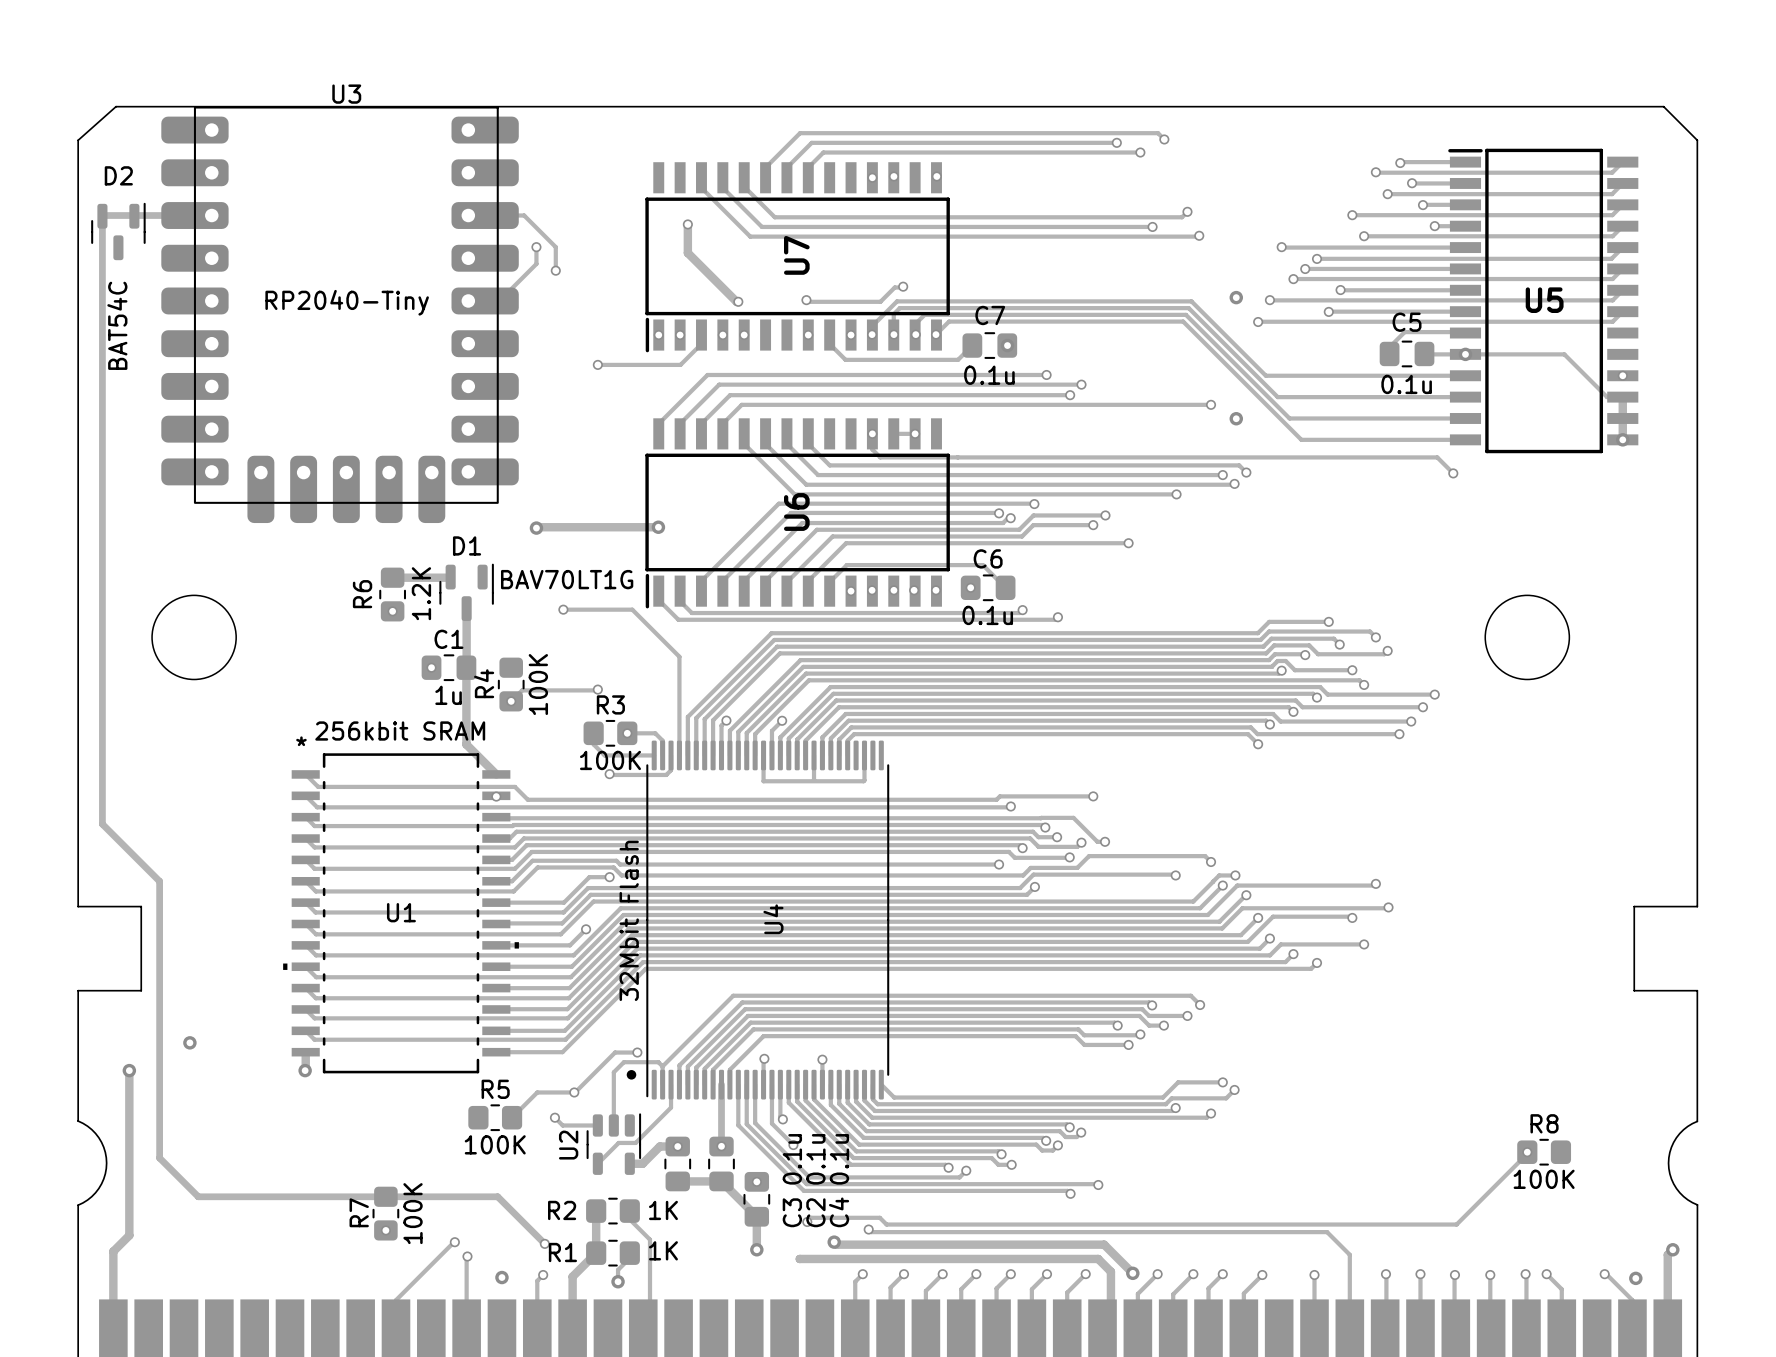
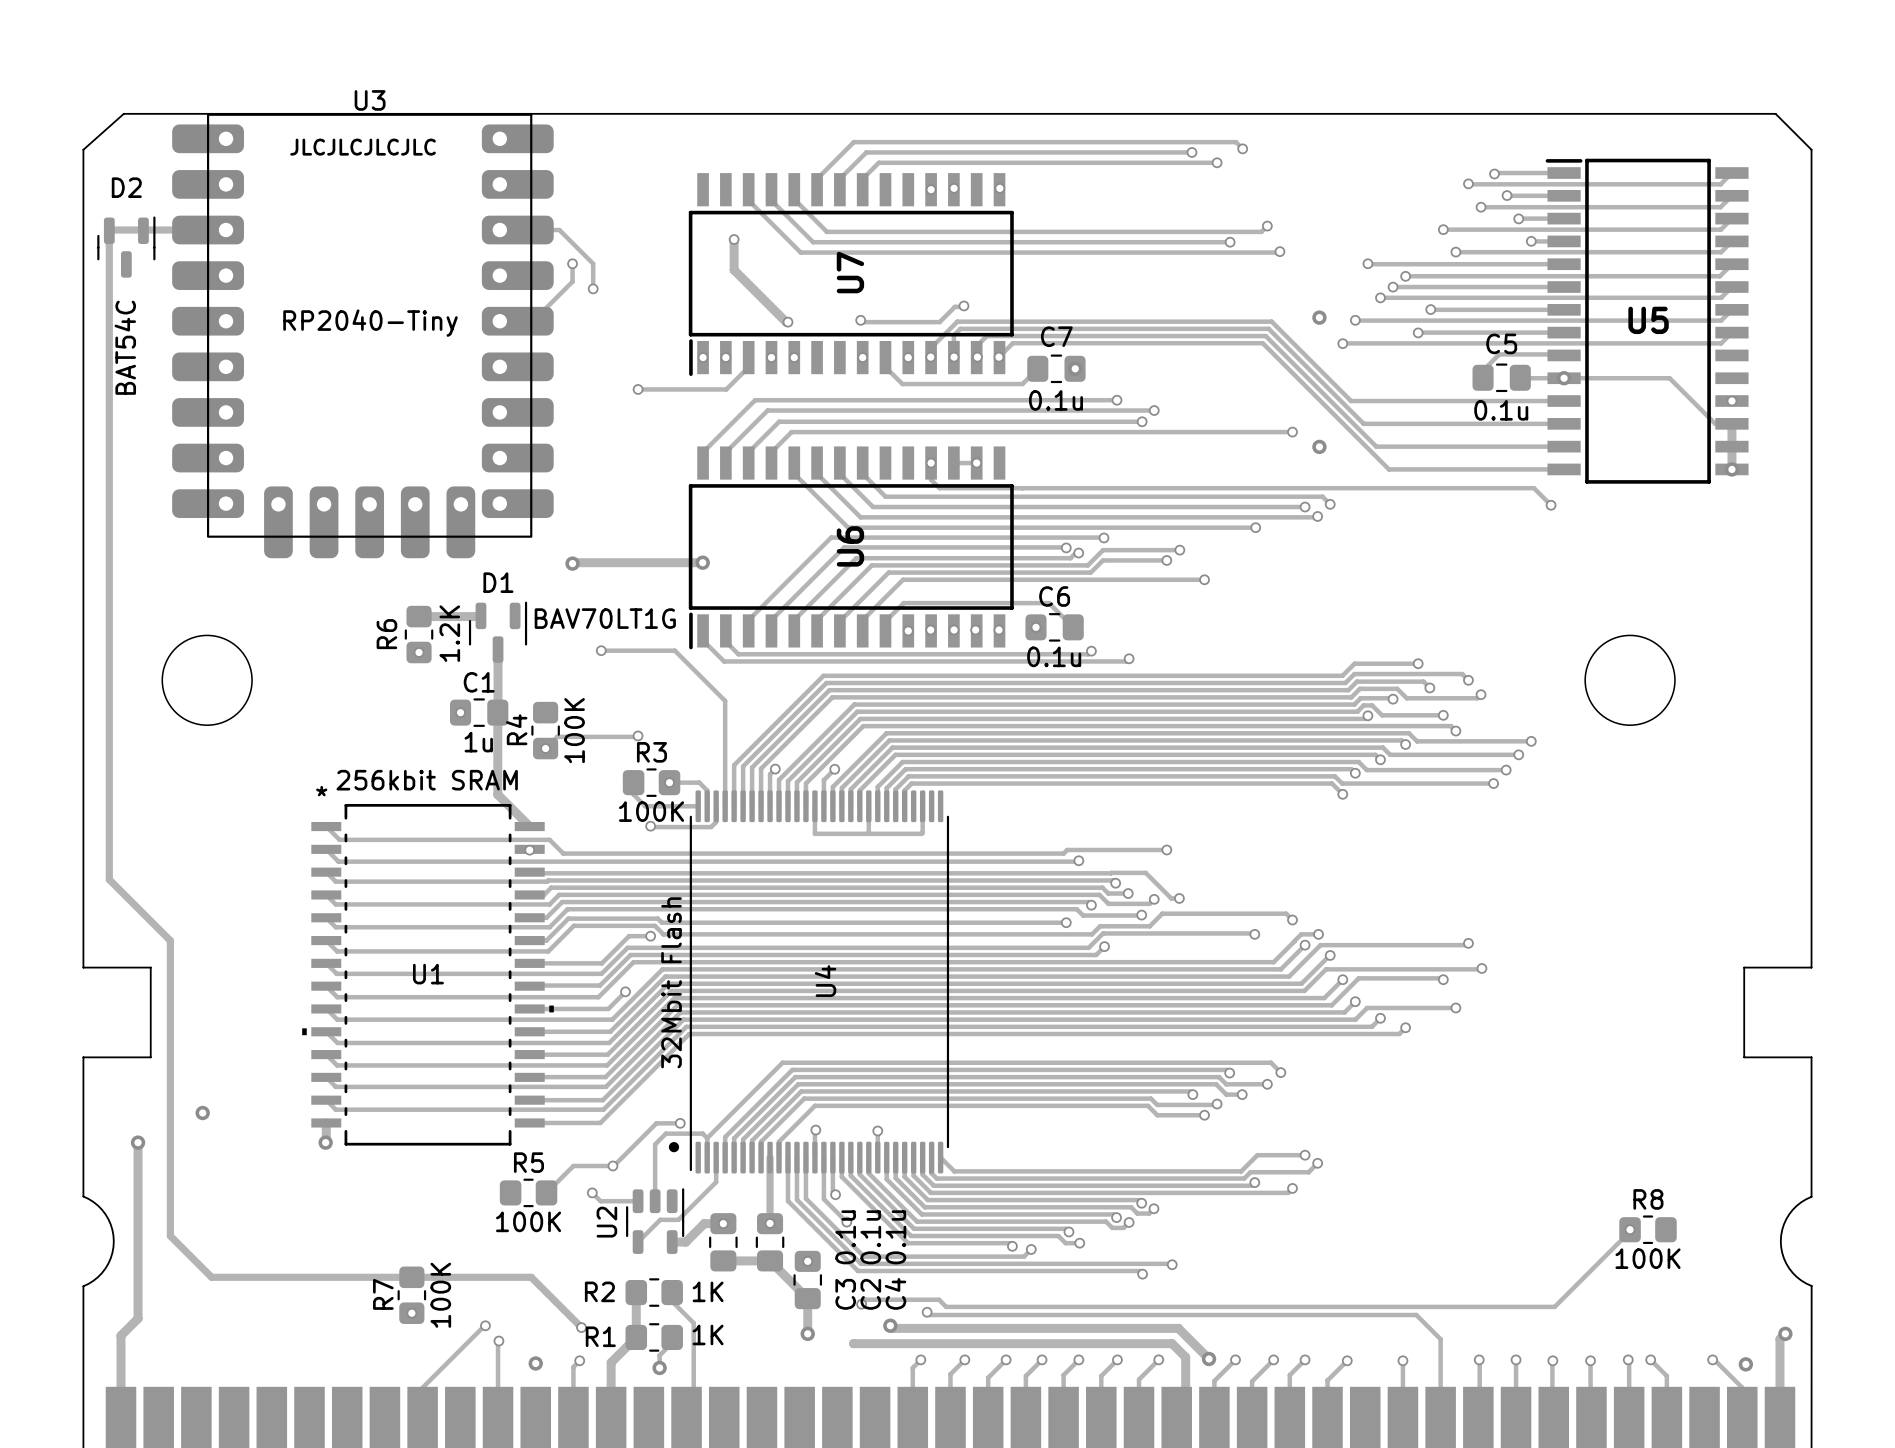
text: none -> JLCJLCJLCJLC (363, 147)

